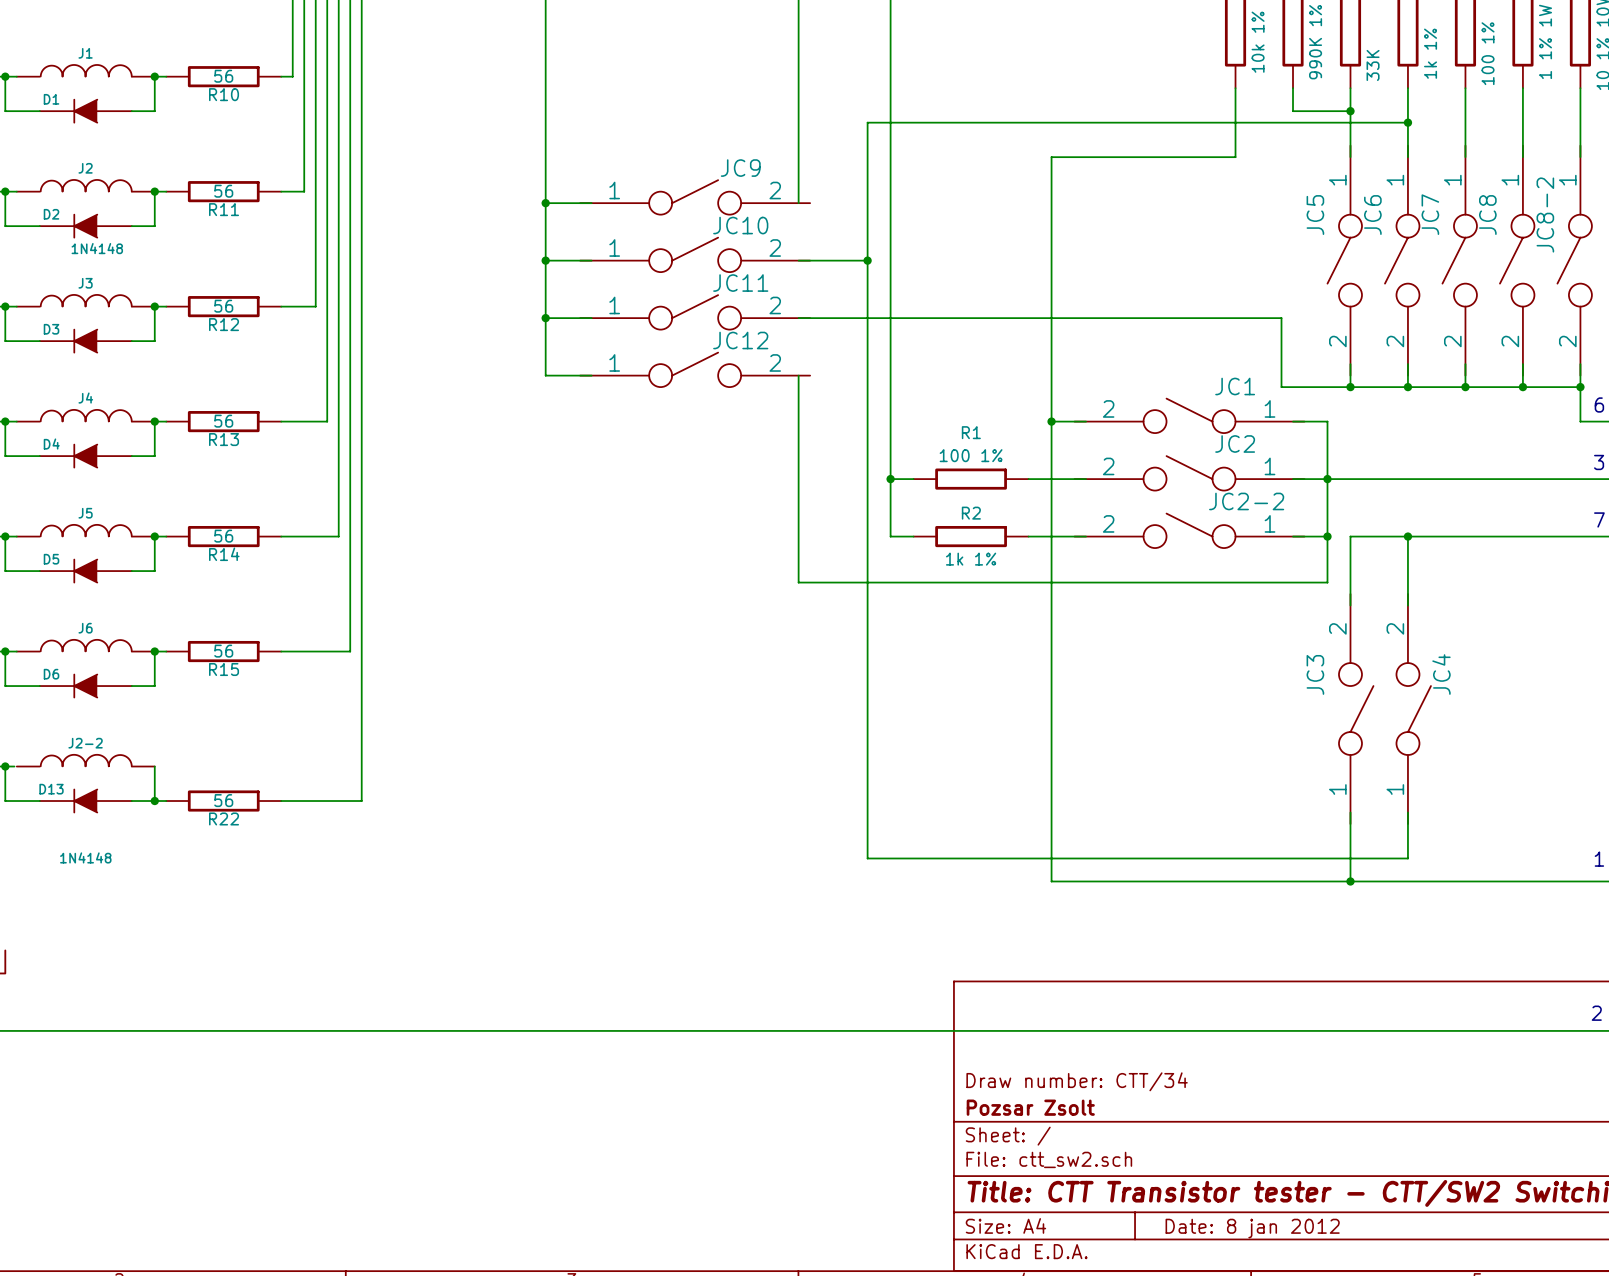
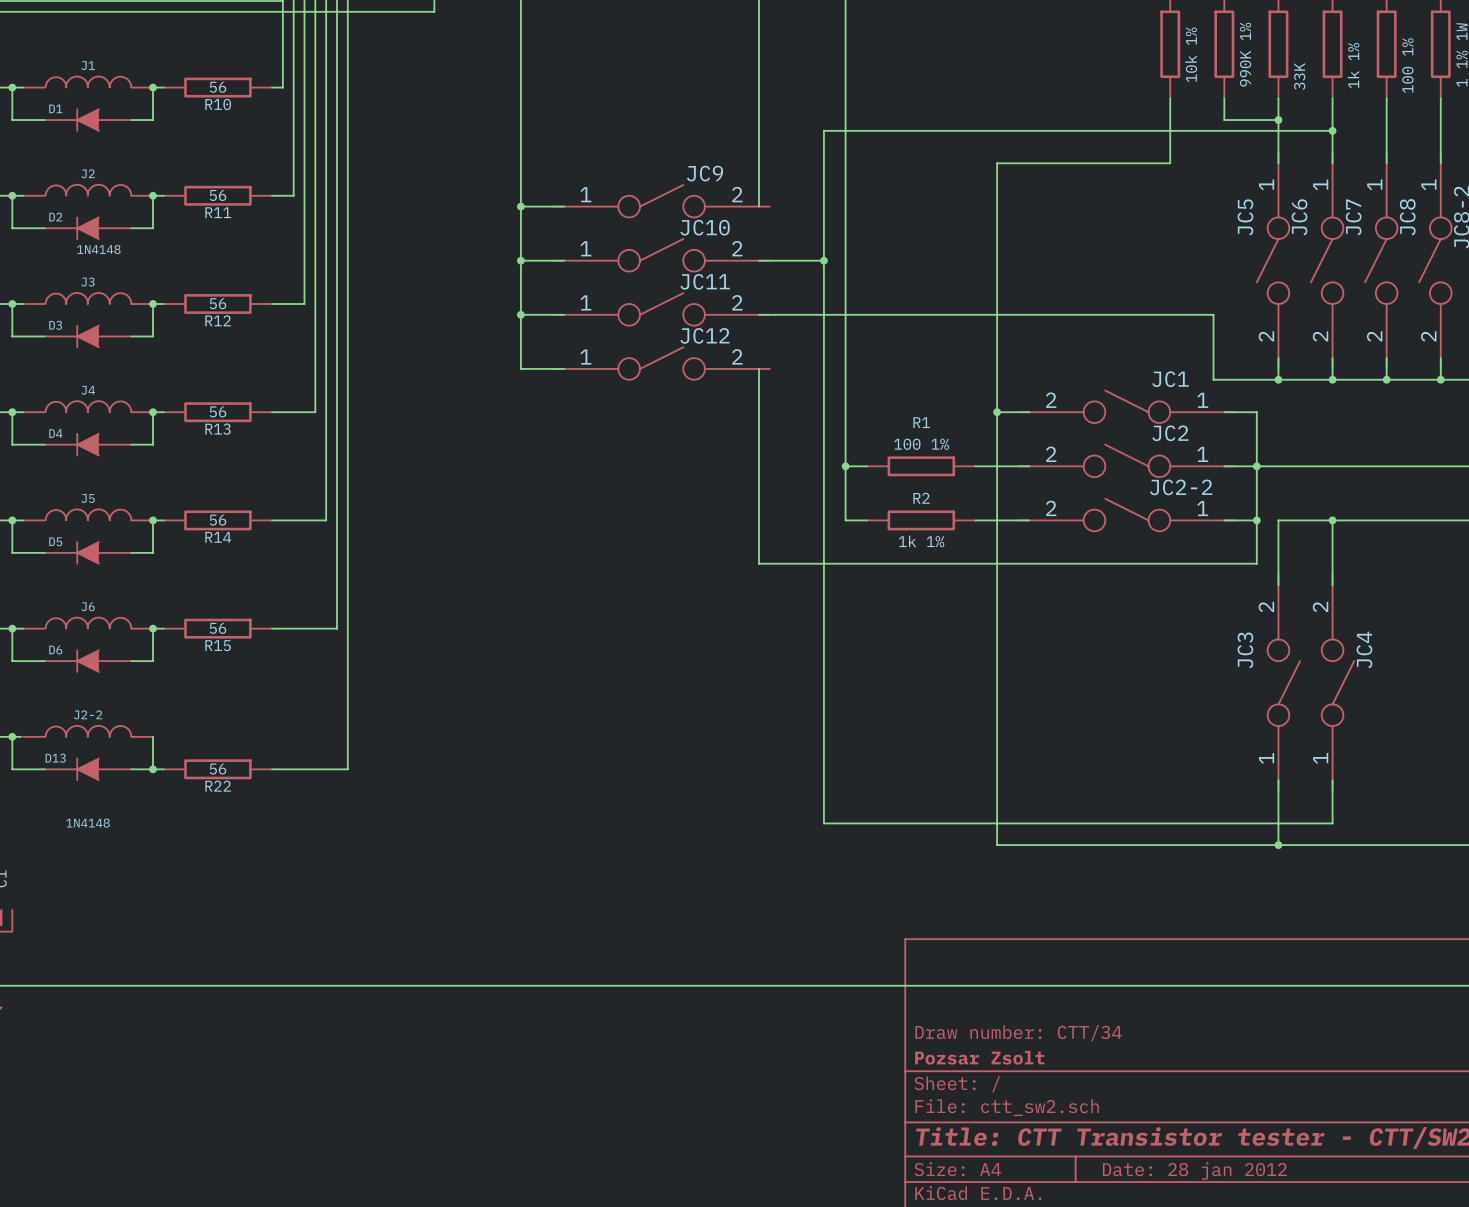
title block: Date: 8 jan 2012 (1252, 1228) -> Date: 28 jan 2012 (1194, 1170)

